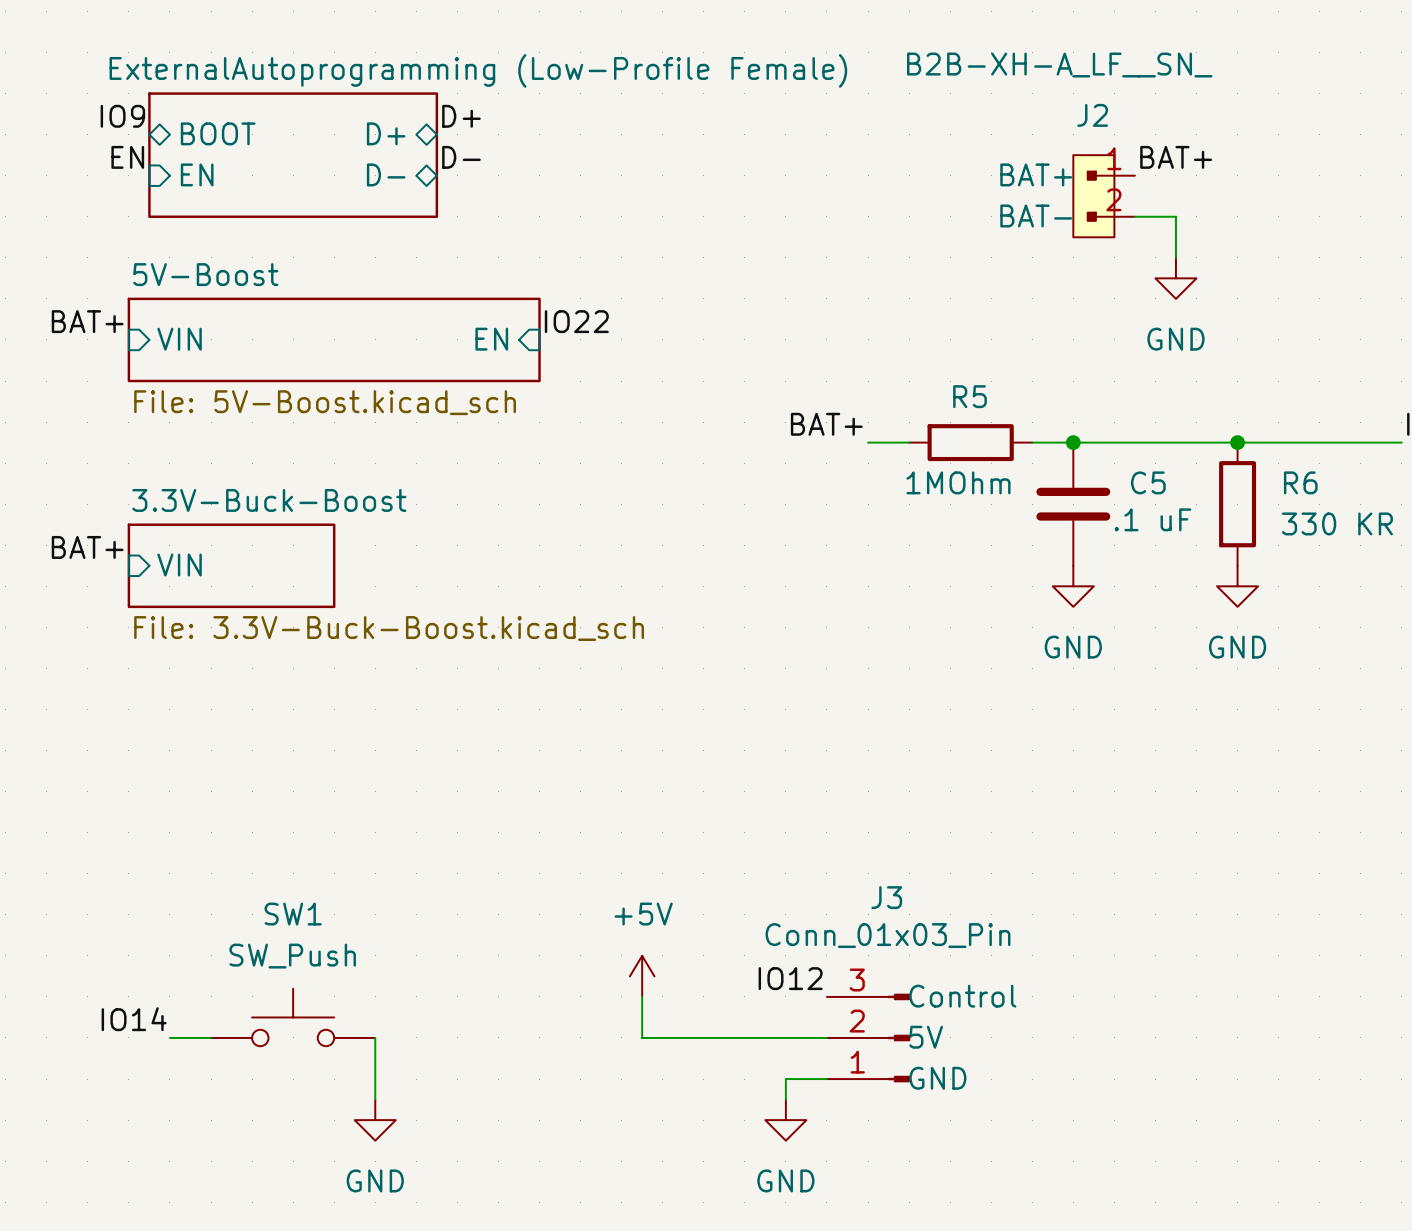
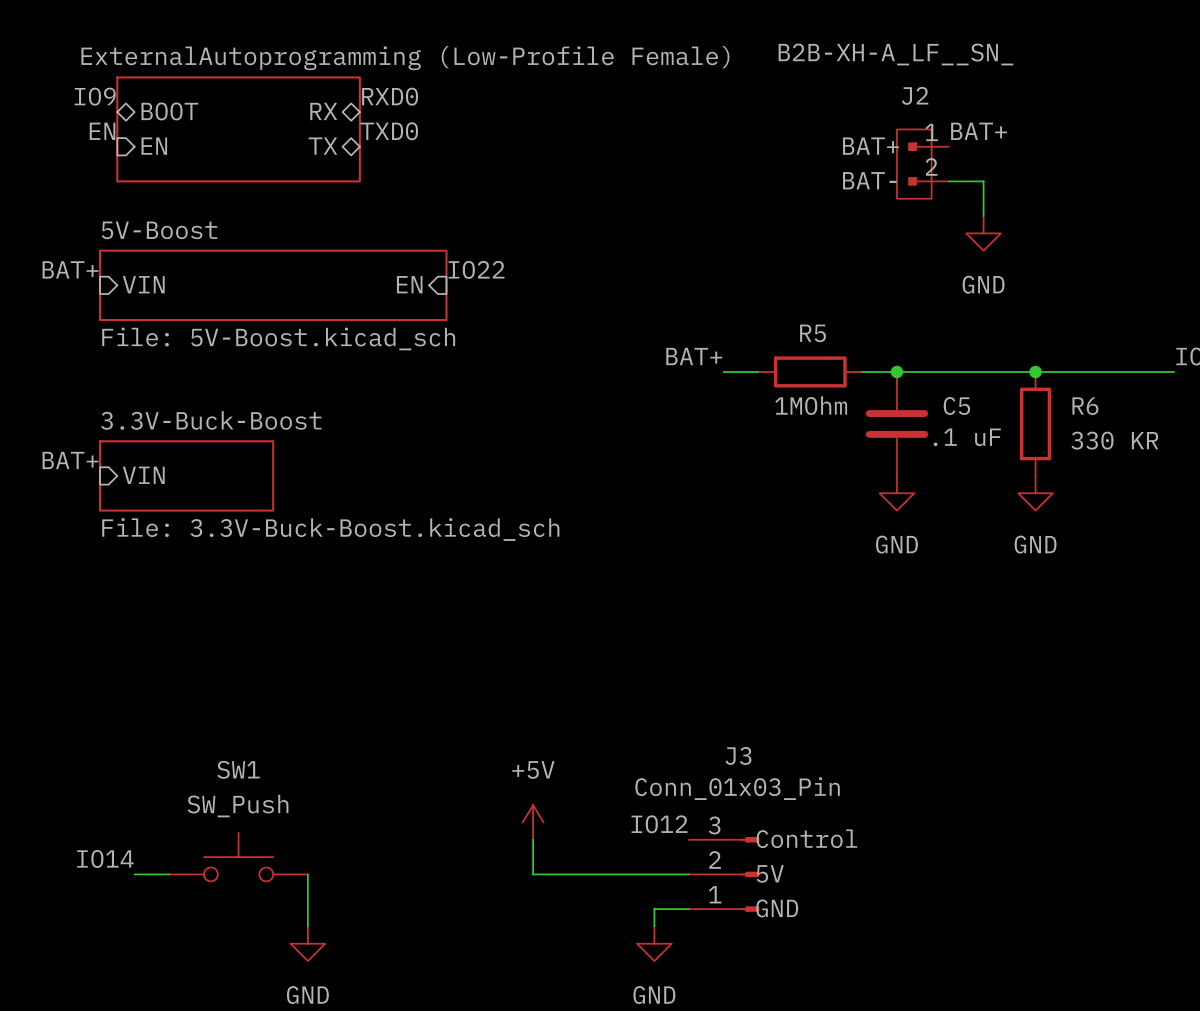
label: D+ (461, 116) -> RXD0 (390, 96)
sheet pin: D+ (386, 133) -> RX (323, 111)
label: D- (461, 157) -> TXD0 (389, 131)
sheet pin: D- (386, 174) -> TX (322, 146)

